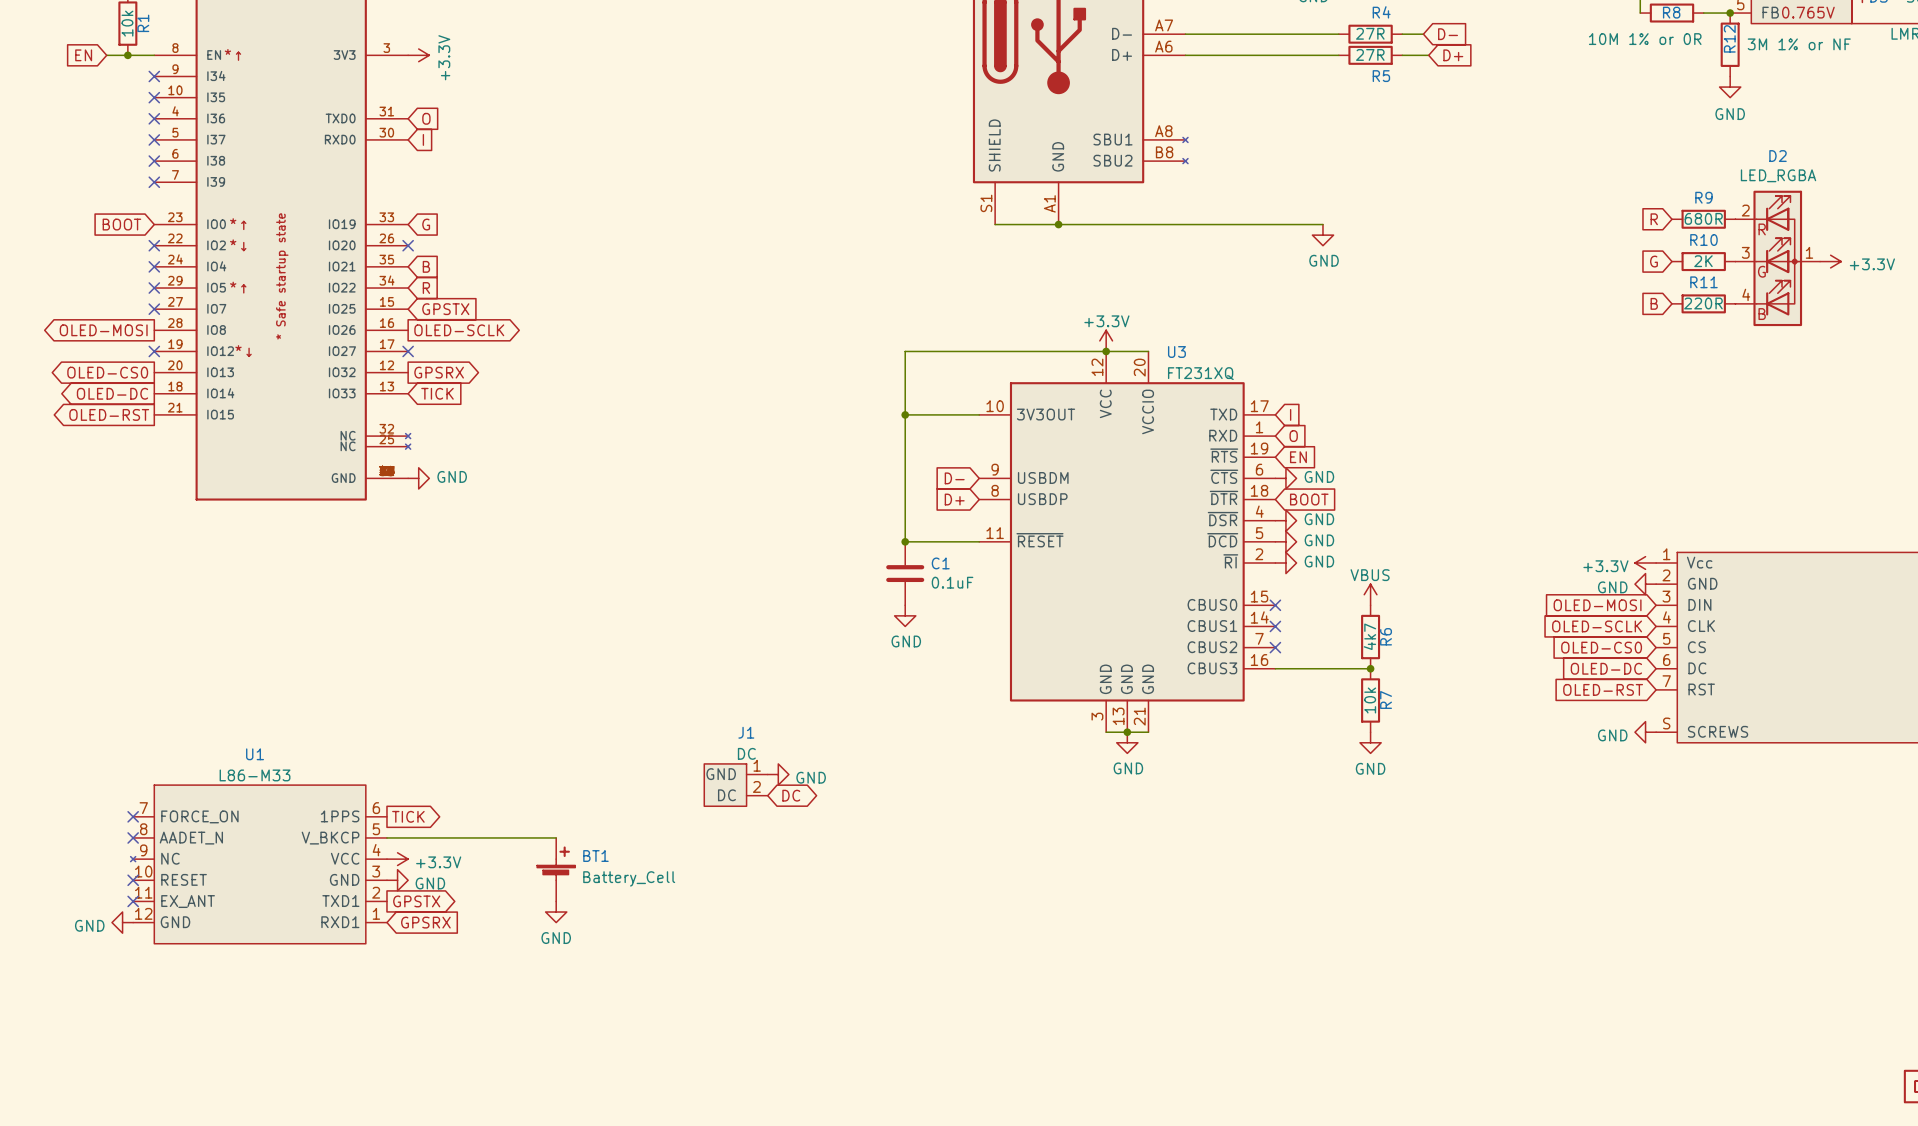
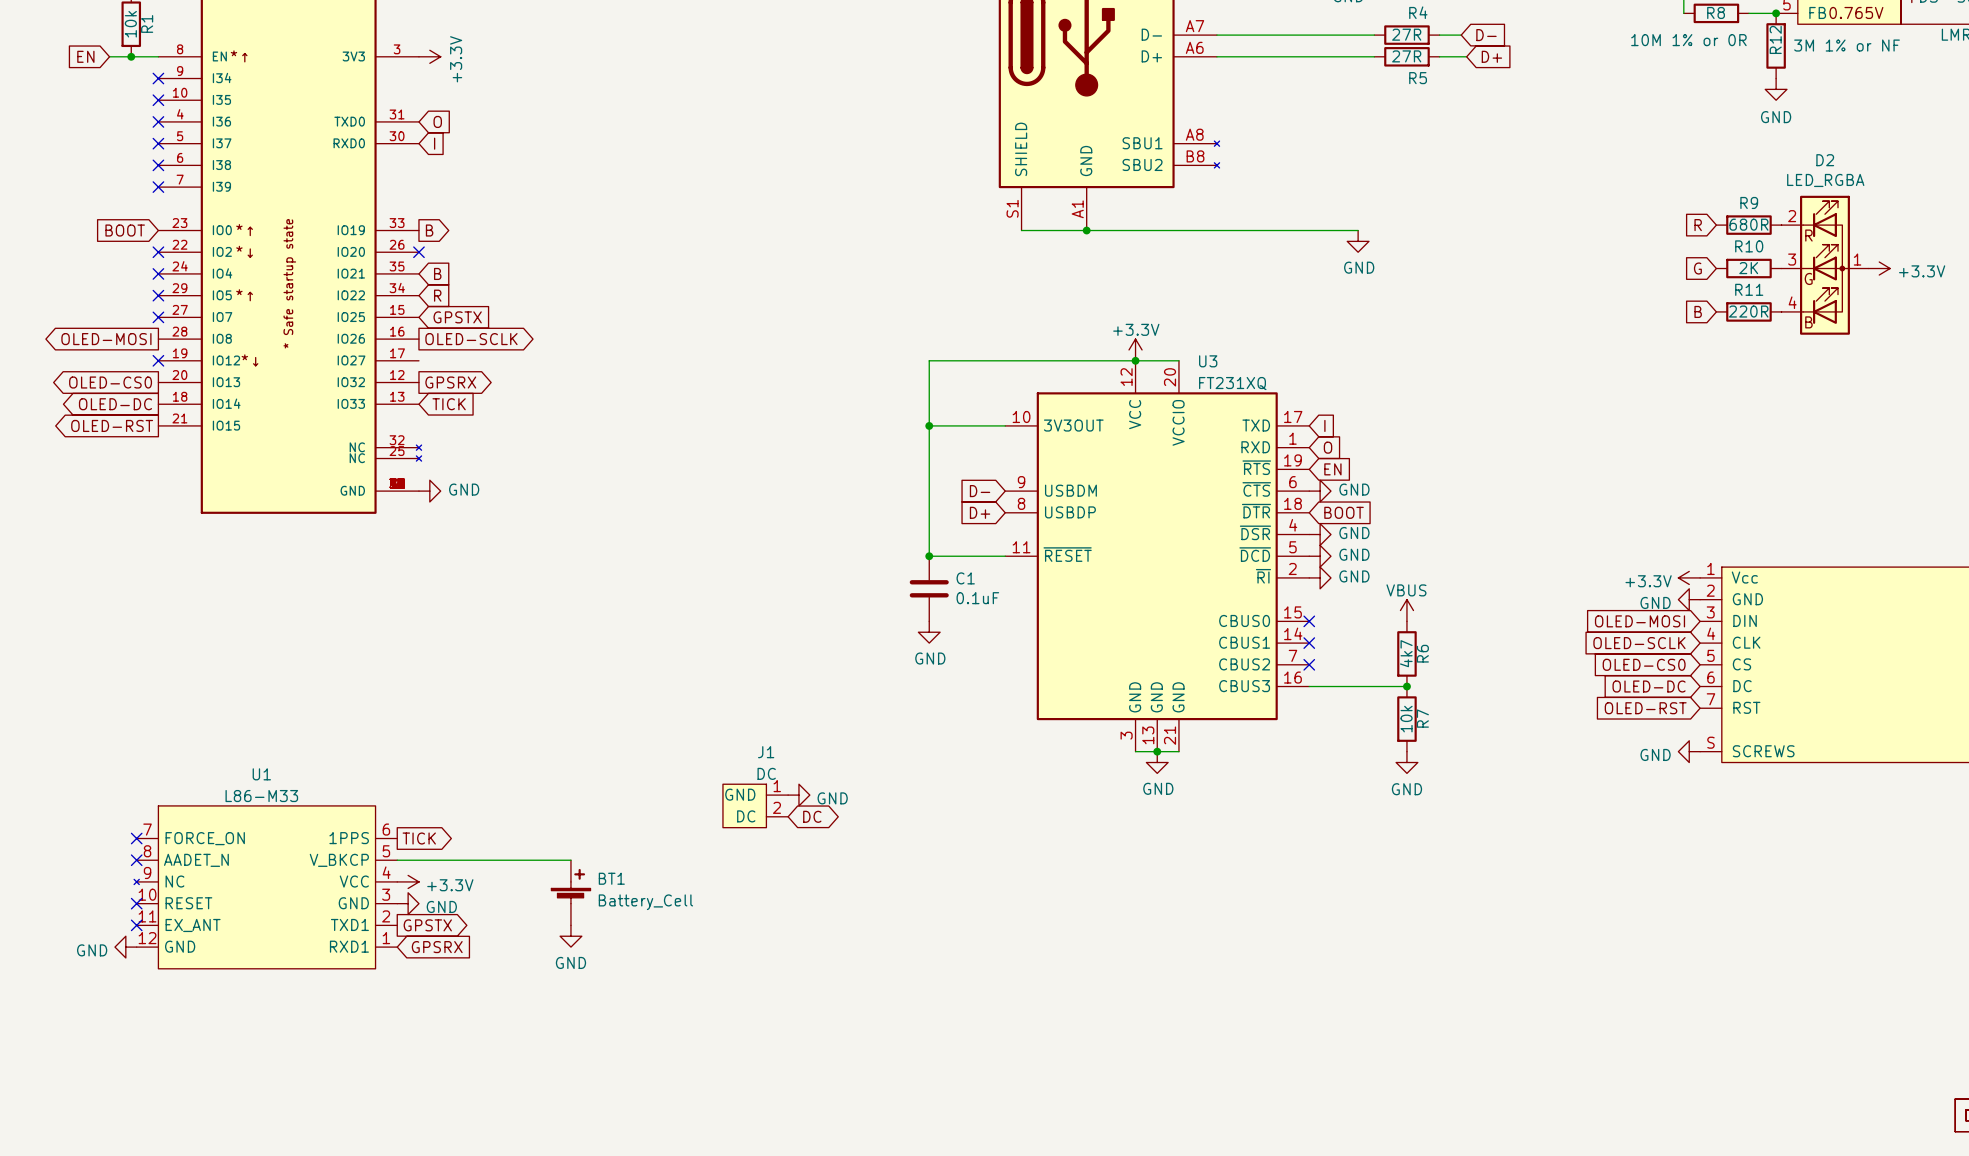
global label shape: input (426, 224) -> output (429, 230)
global label: G (426, 224) -> B (429, 230)
no-connect mark: (408, 351) -> none

